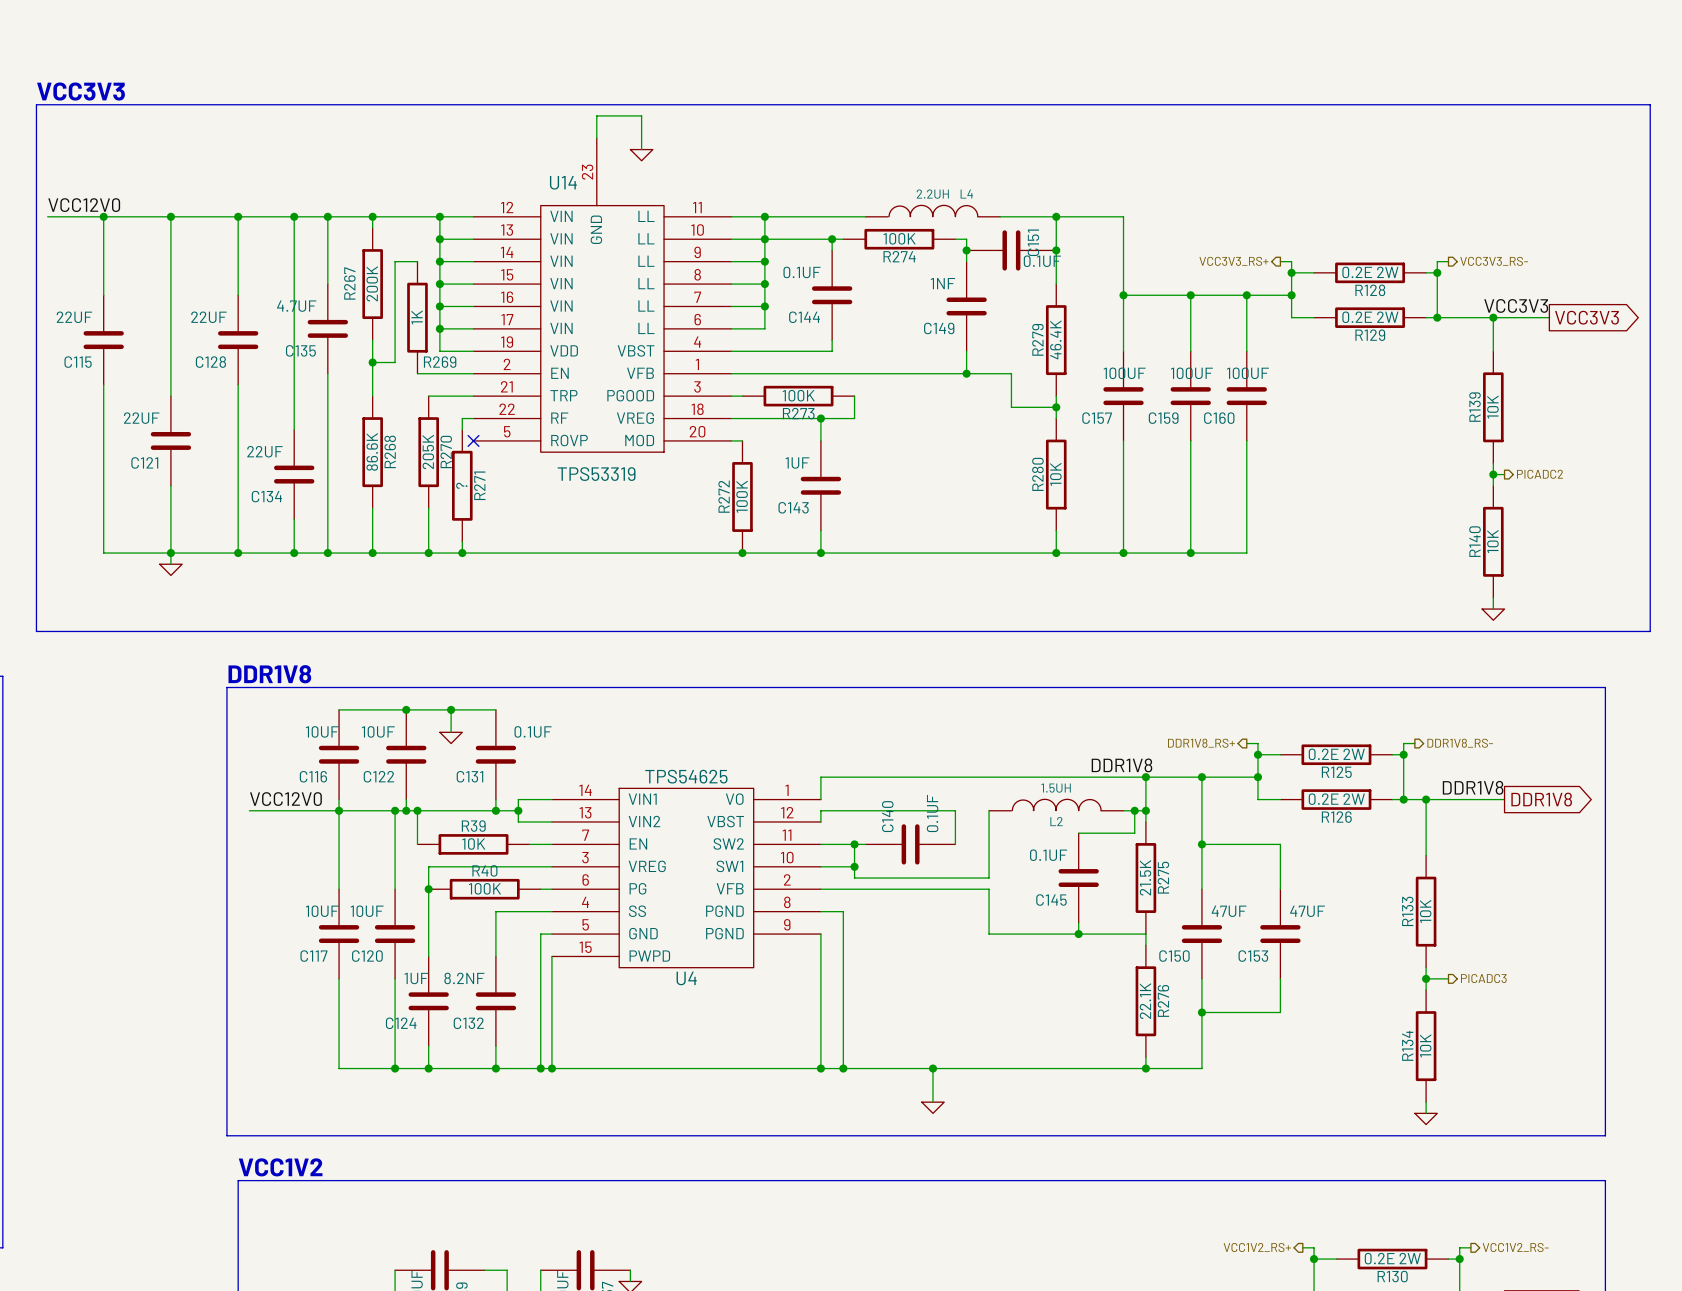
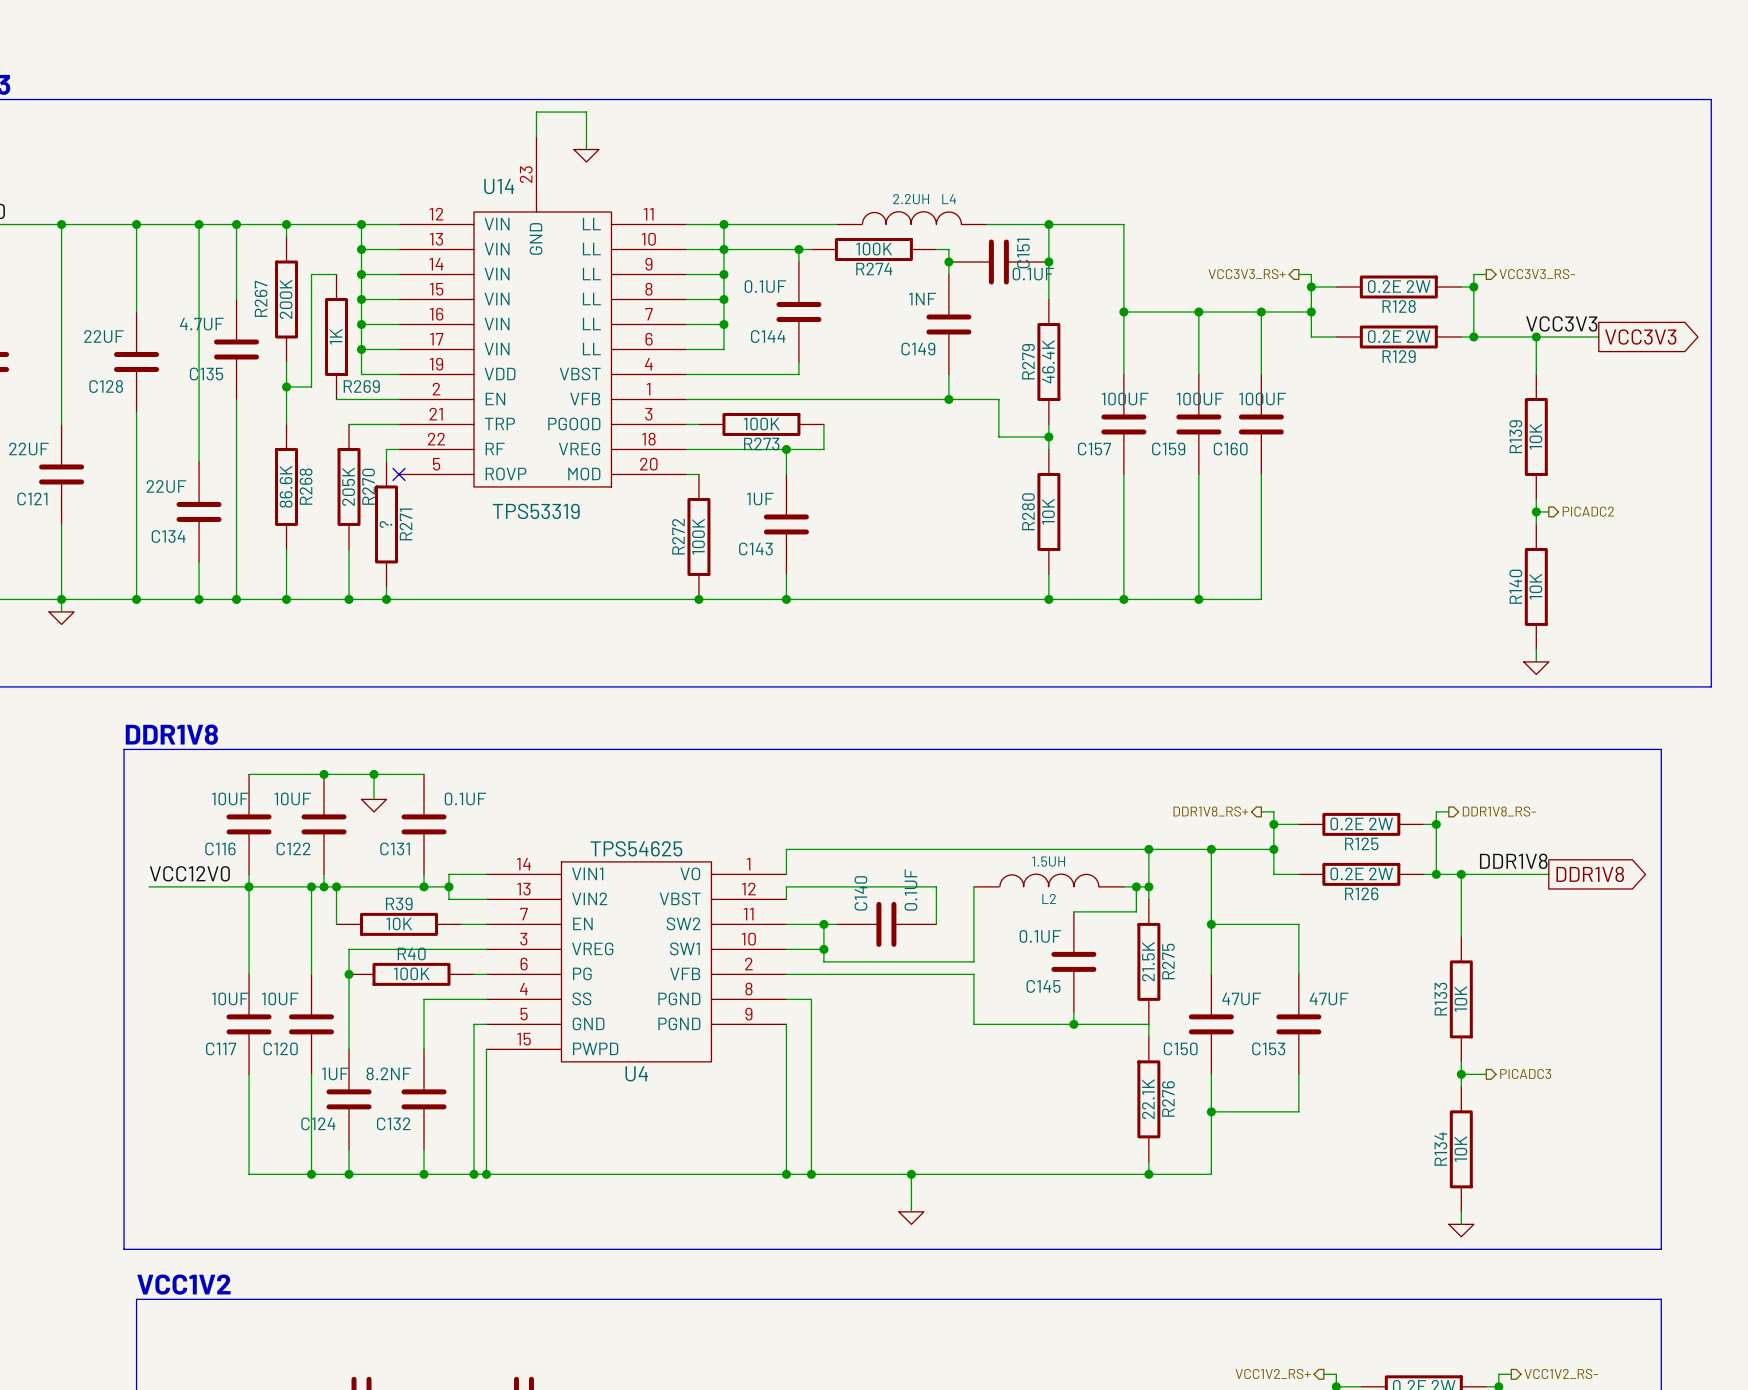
label: DDR1V8 (1121, 765) -> none

